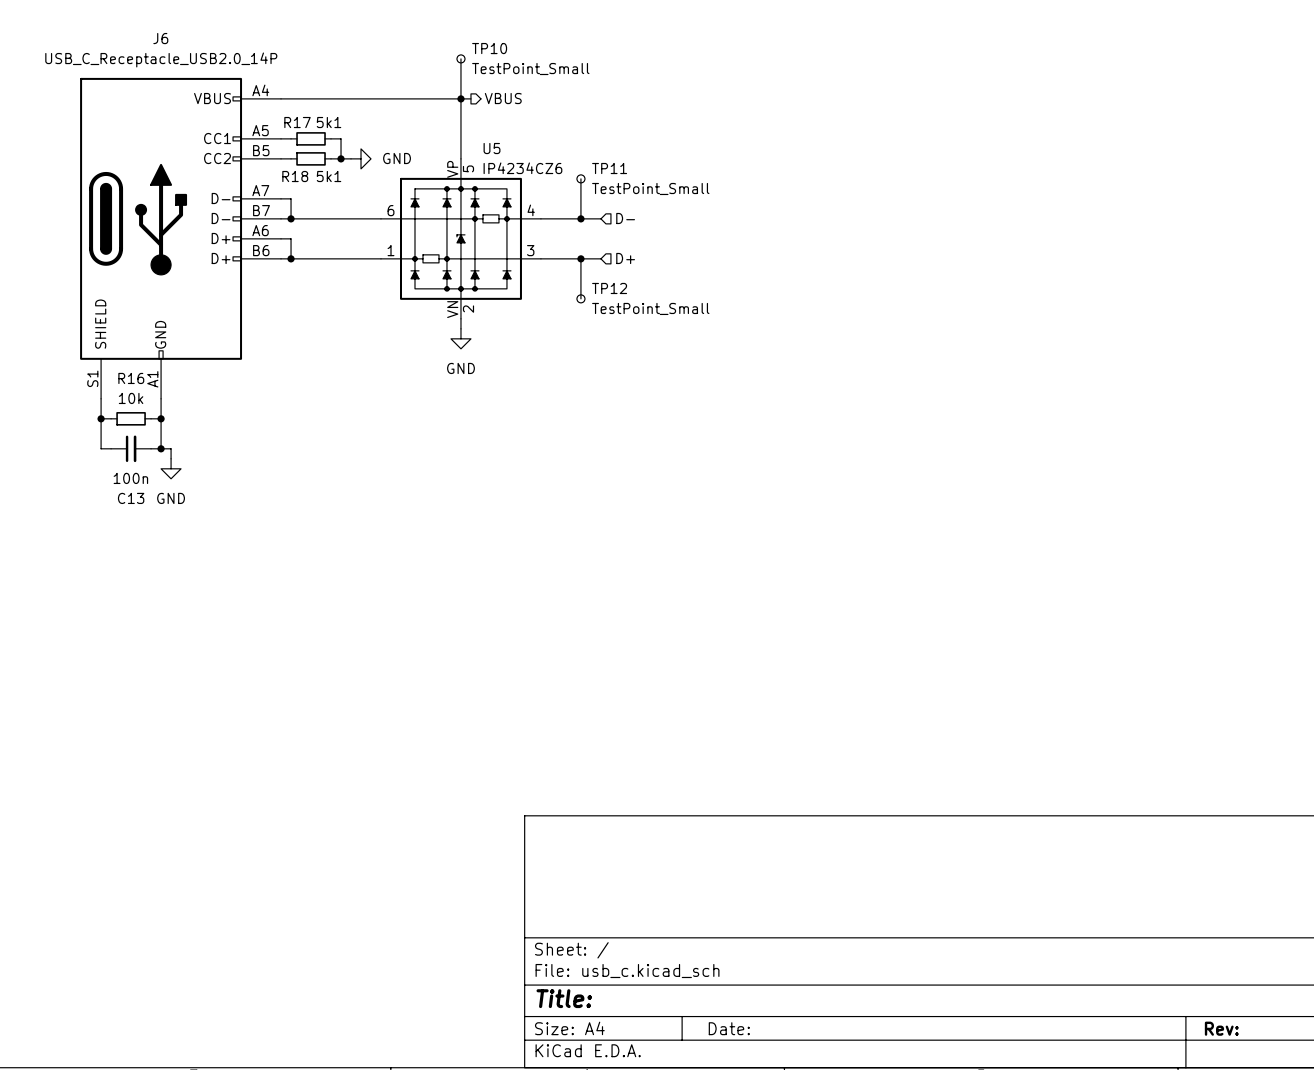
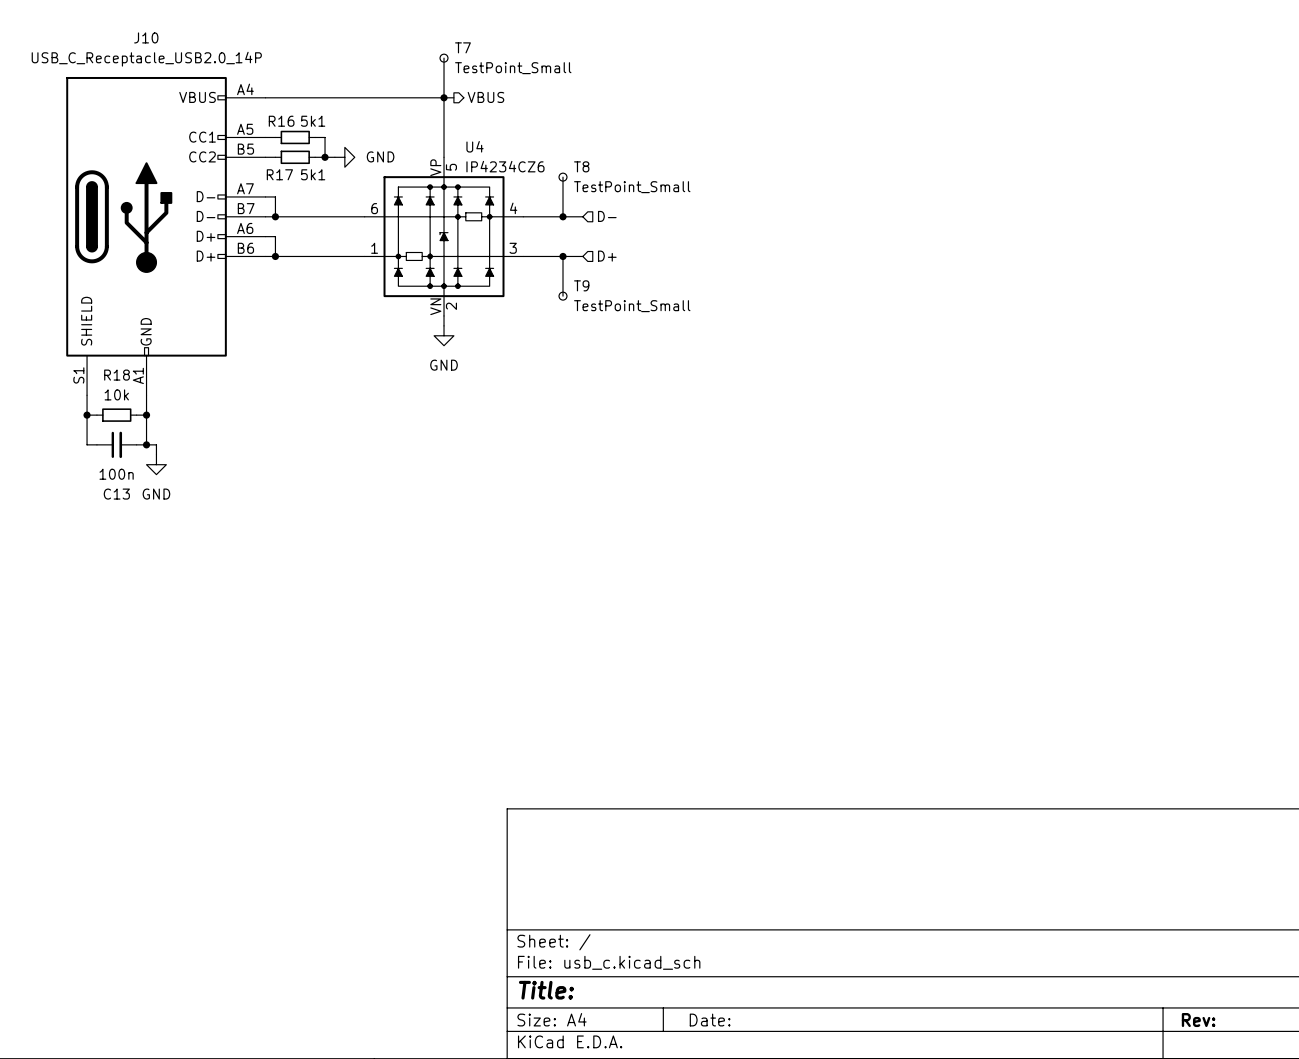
J6 name: J6 (160, 38) -> J10 (146, 37)
TP10 name: TP10 (489, 48) -> T7 (462, 47)
R17 name: R17 (297, 122) -> R16 (281, 121)
U5 name: U5 (492, 148) -> U4 (475, 146)
TP11 name: TP11 (609, 168) -> T8 (581, 166)
R18 name: R18 (295, 176) -> R17 (279, 174)
TP12 name: TP12 (609, 288) -> T9 (581, 285)
R16 name: R16 (131, 378) -> R18 (117, 375)

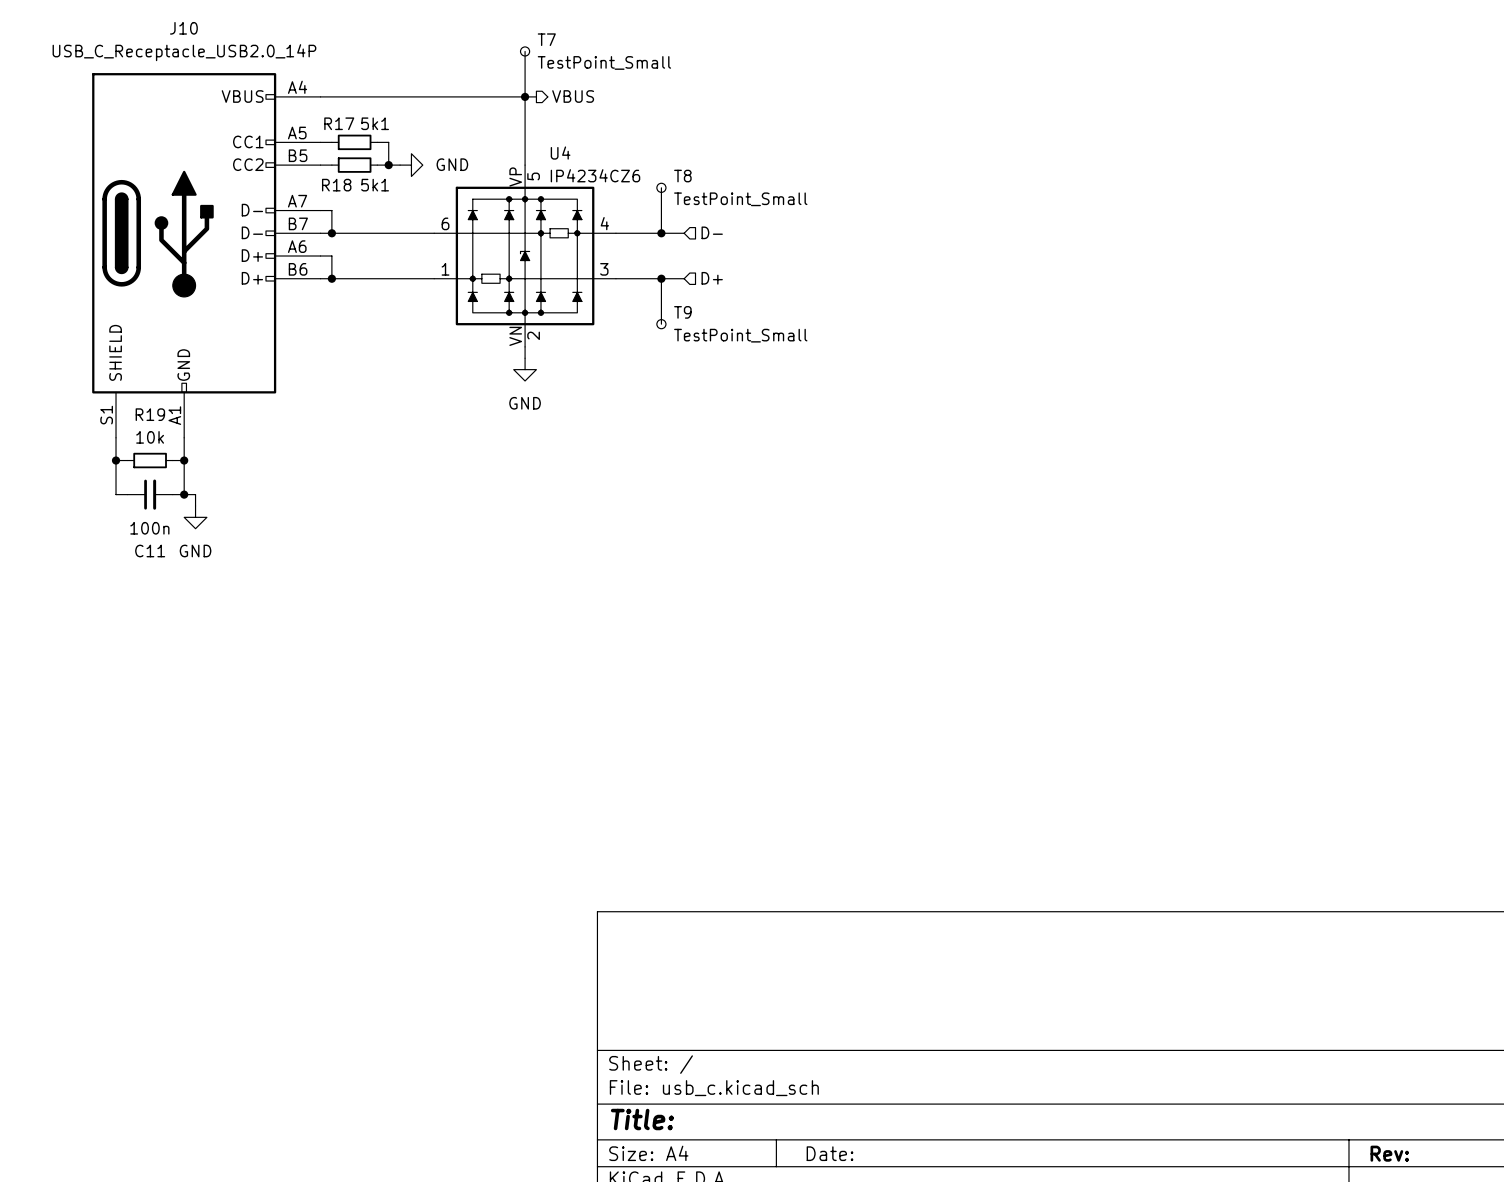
R16 name: R16 (281, 121) -> R17 (339, 123)
R17 name: R17 (279, 174) -> R18 (336, 185)
R18 name: R18 (117, 375) -> R19 (150, 414)
C13 name: C13 (116, 494) -> C11 (150, 551)

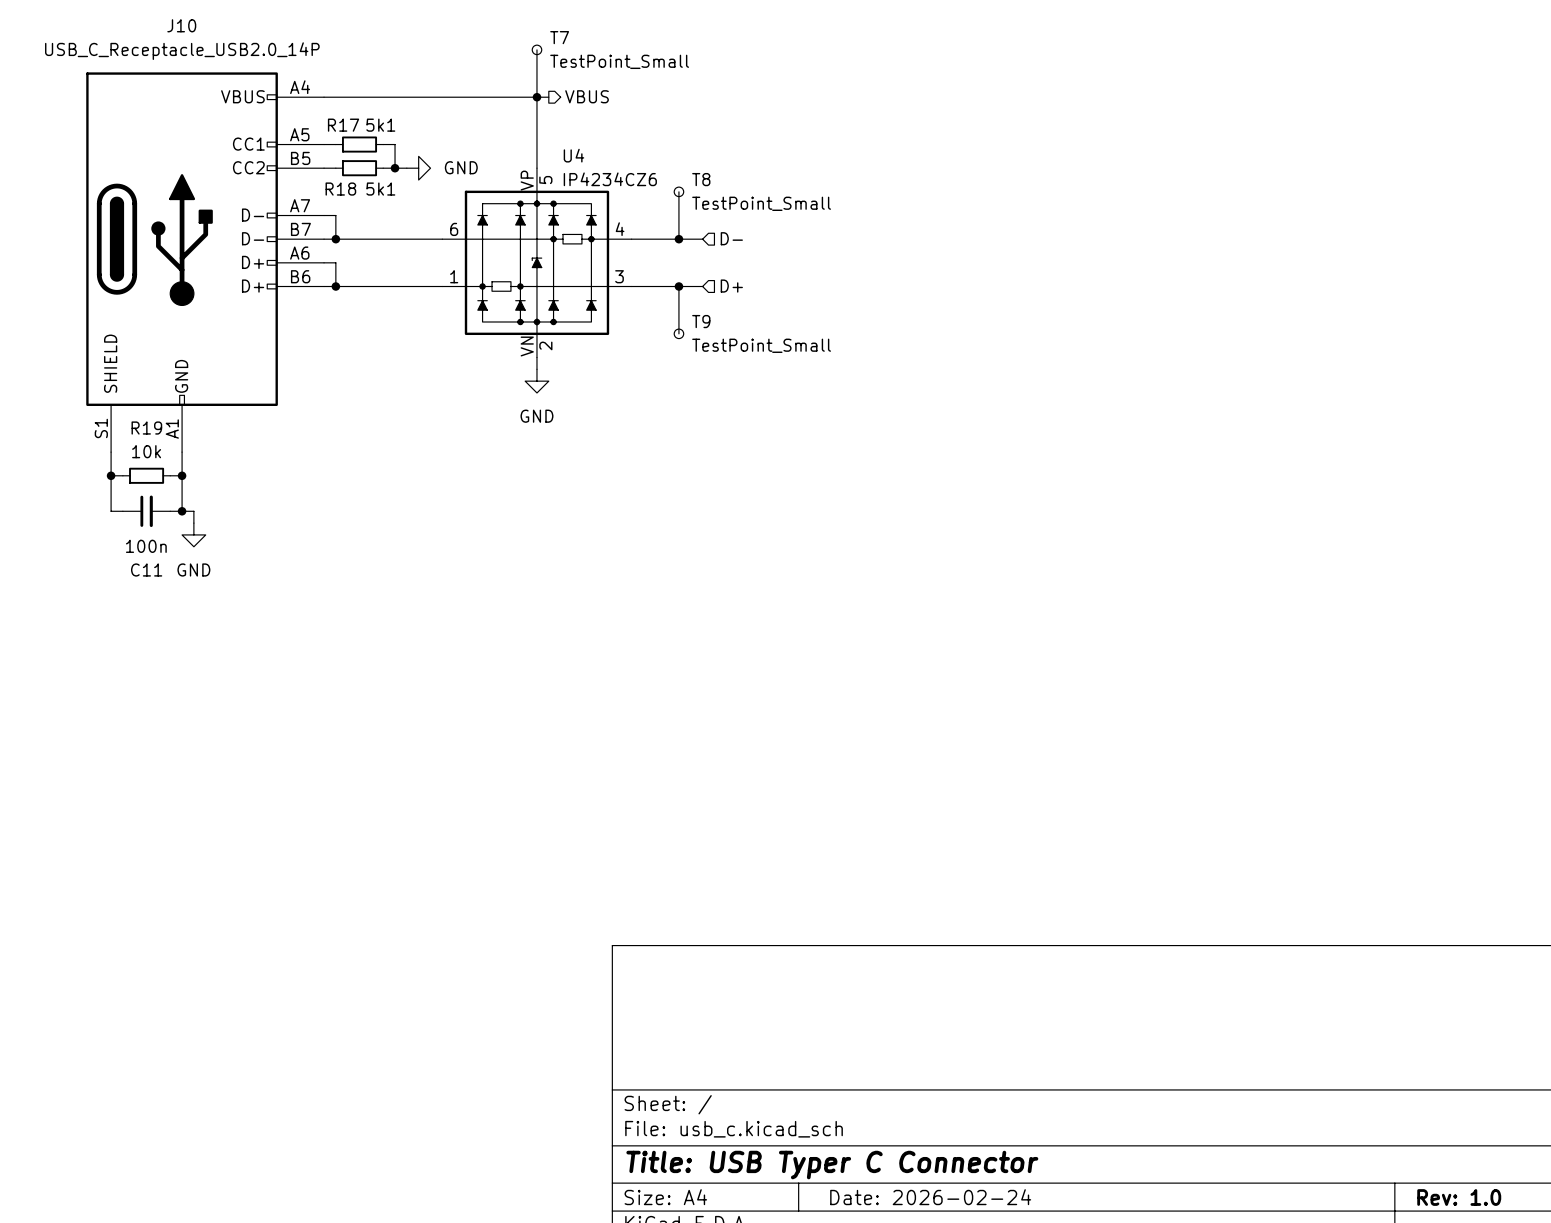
title block: Title: (642, 1119) -> Title: USB Typer C Connector (832, 1165)
title block: Date: (830, 1153) -> Date: 2026-02-24 (930, 1197)
title block: Rev: (1389, 1153) -> Rev: 1.0 (1459, 1197)

